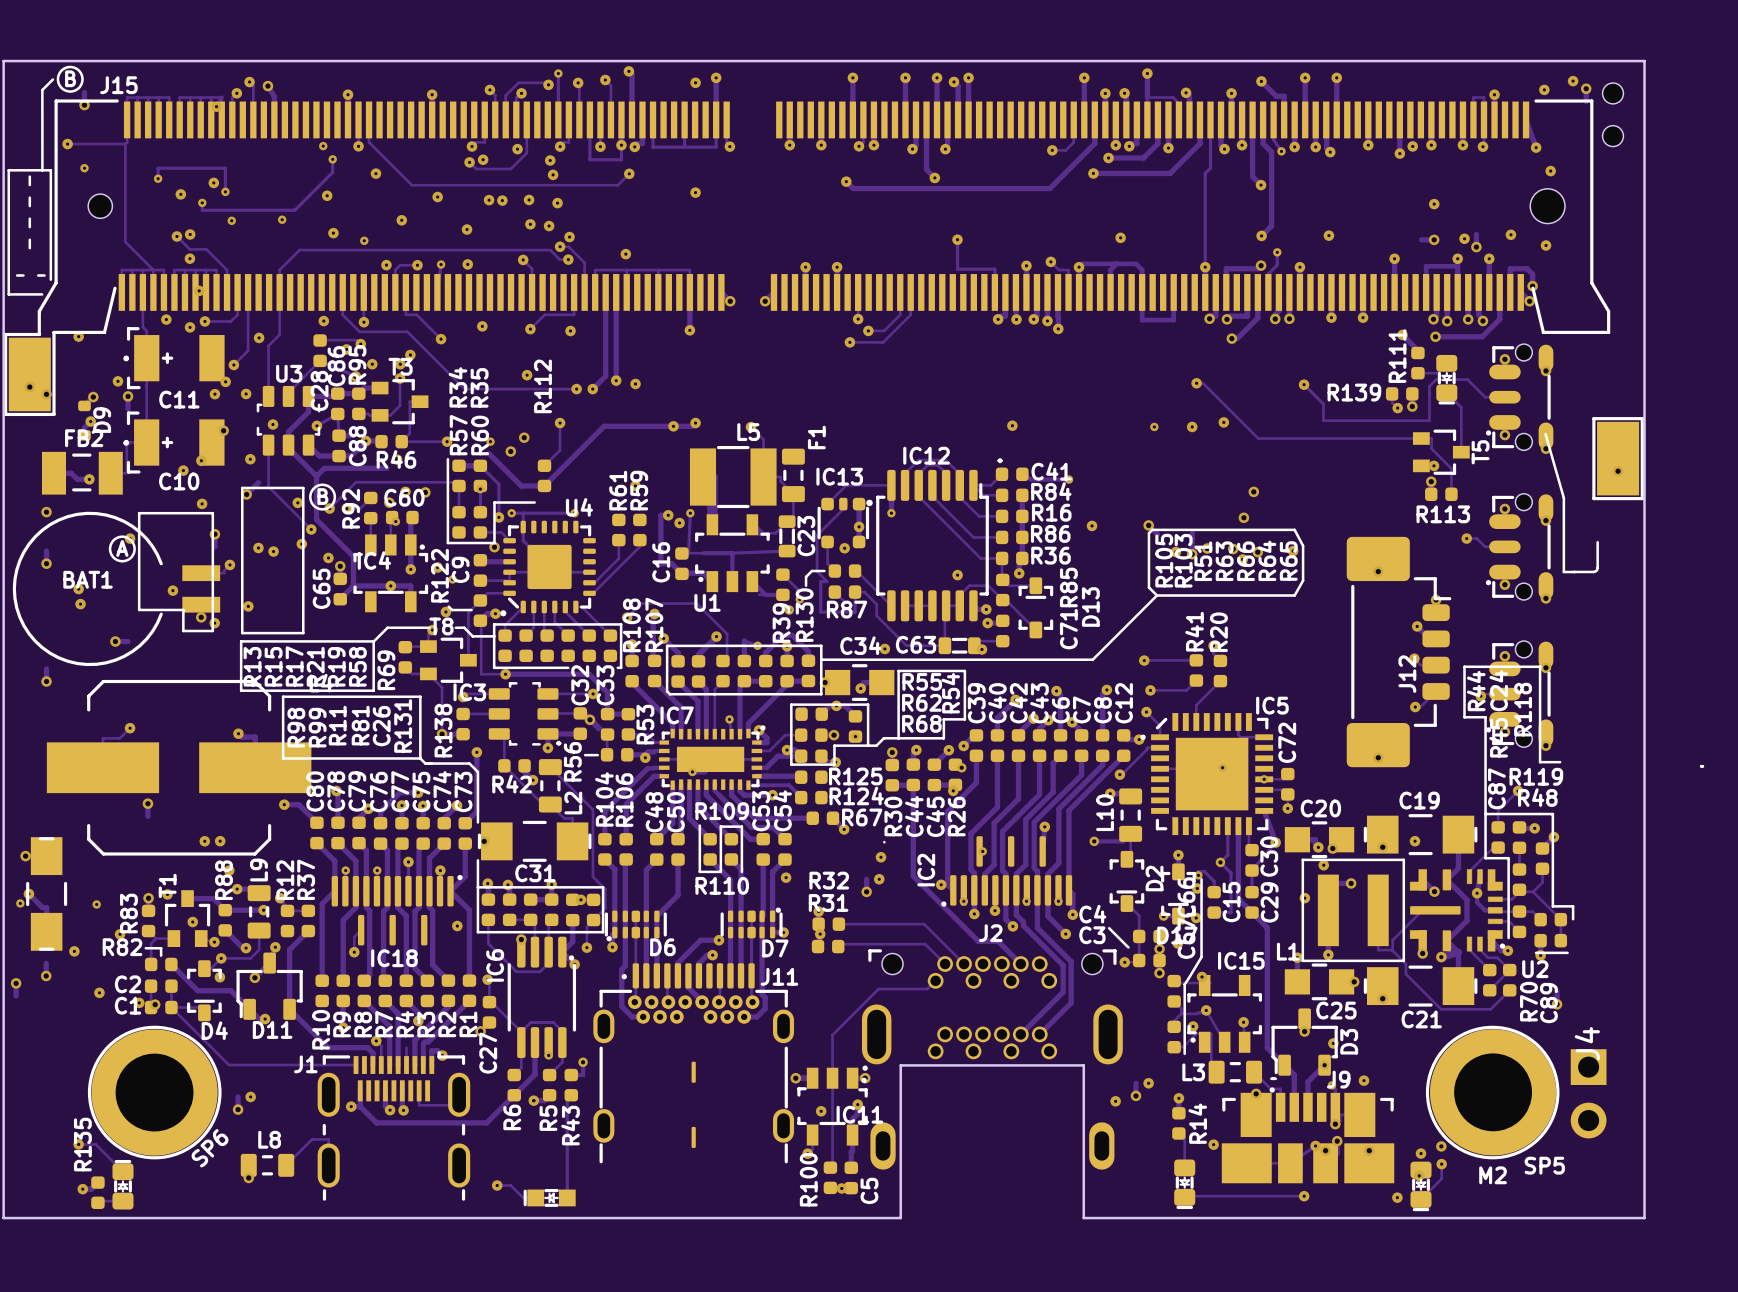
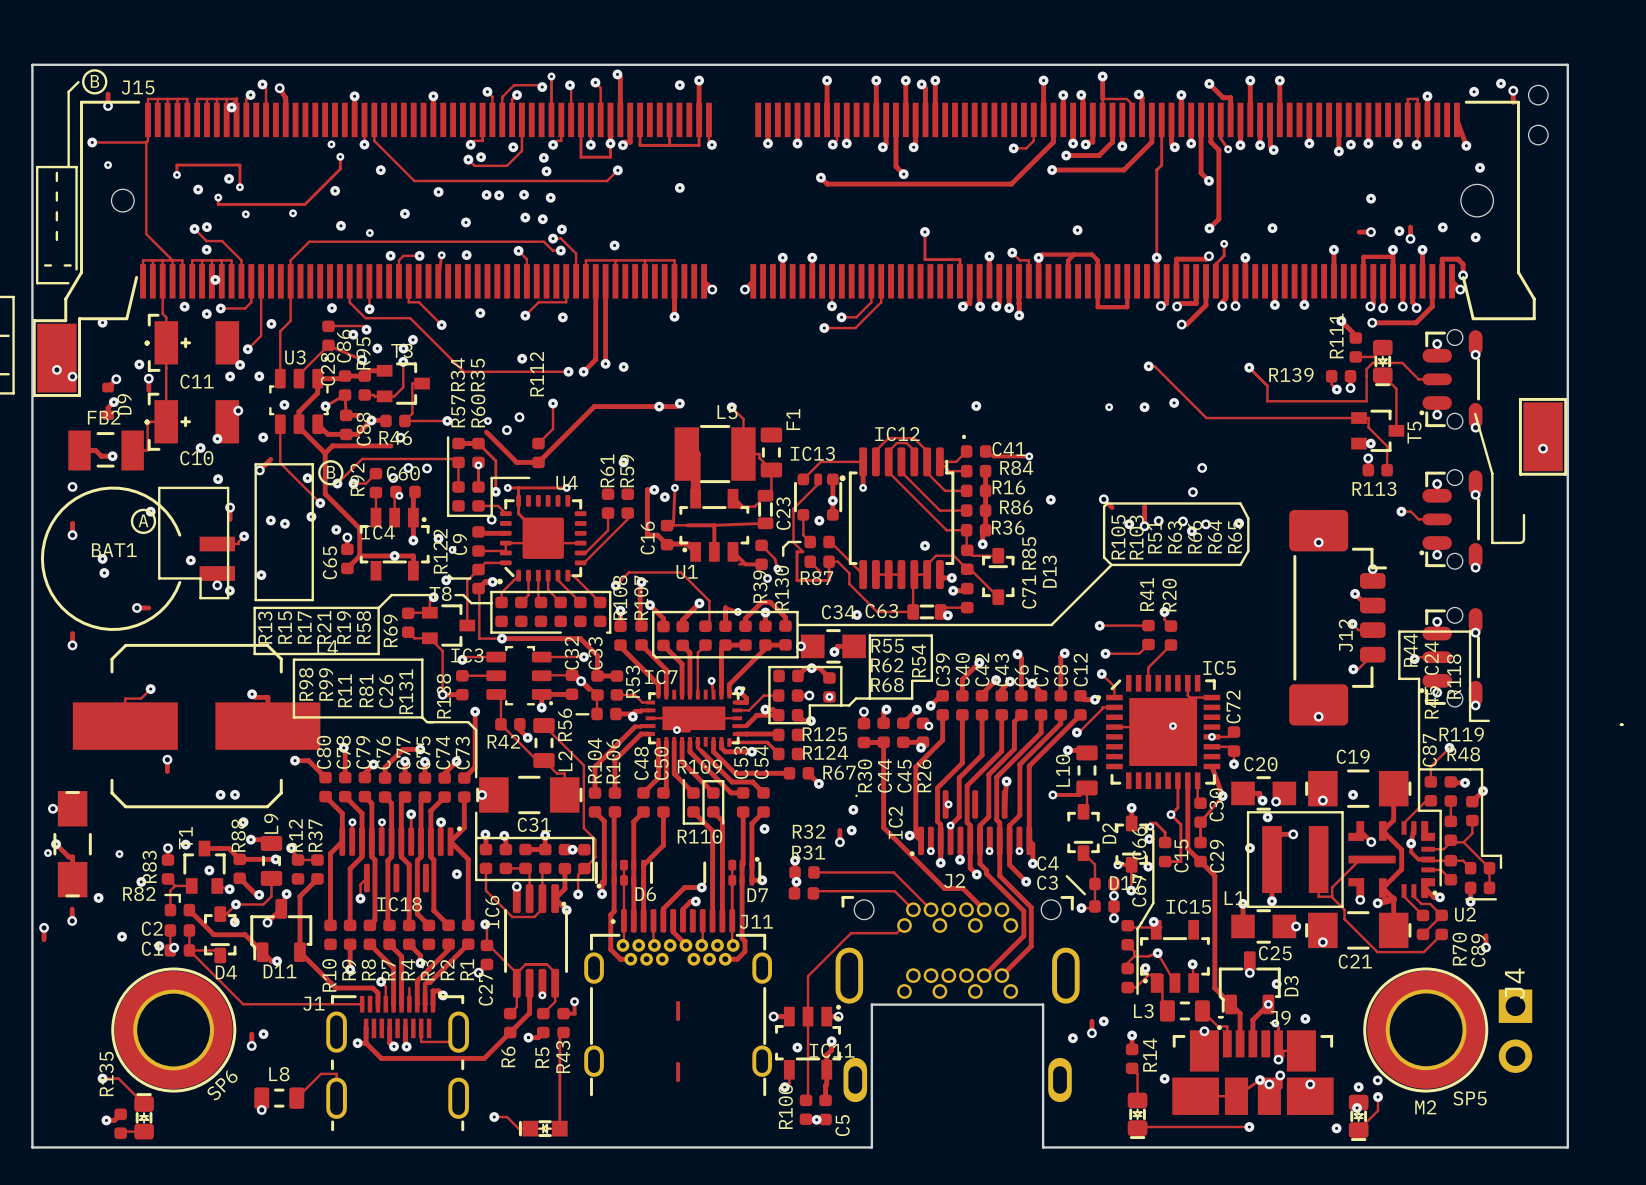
via: none -> (950, 825)

